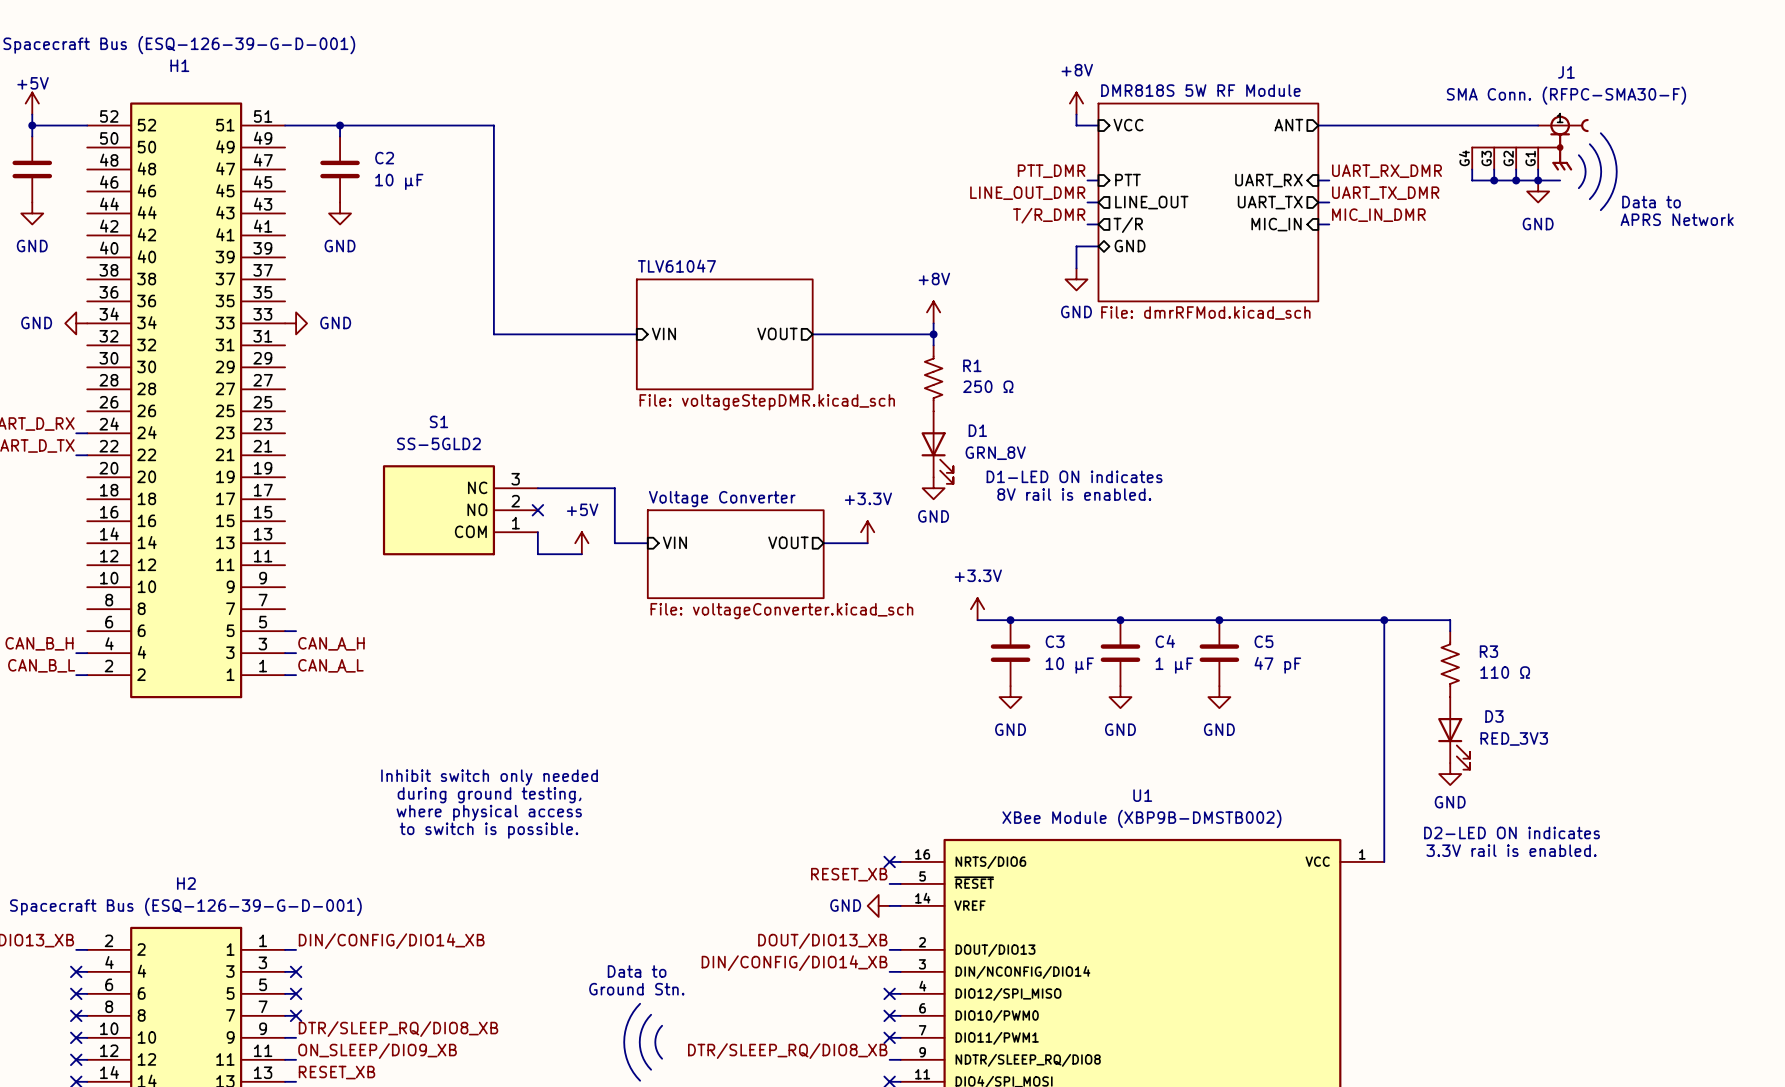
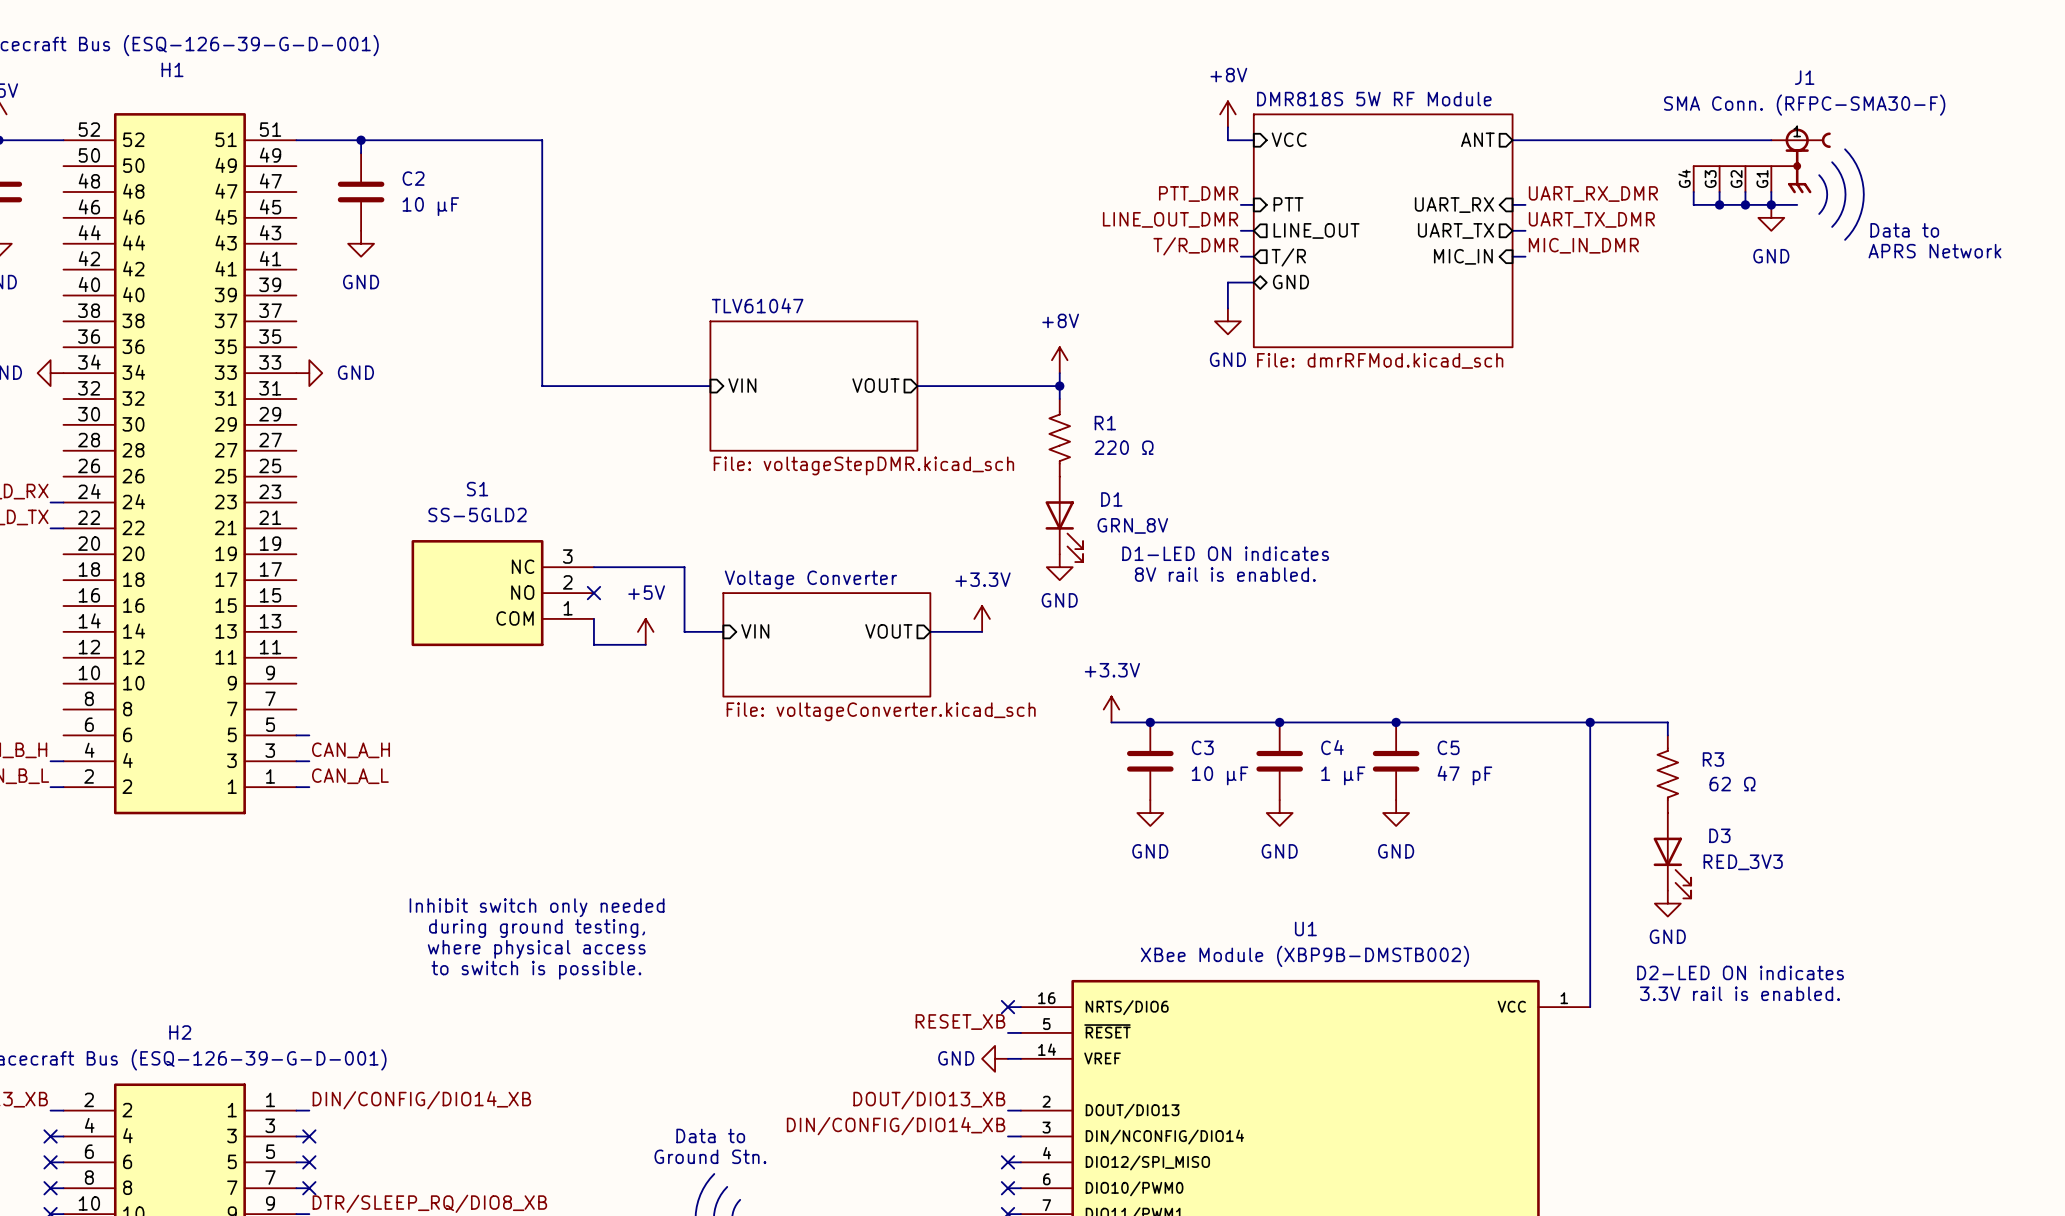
R1 value: 250 Ω (988, 386) -> 220 Ω (1124, 447)
R3 value: 110 Ω (1505, 672) -> 62 Ω (1732, 784)

